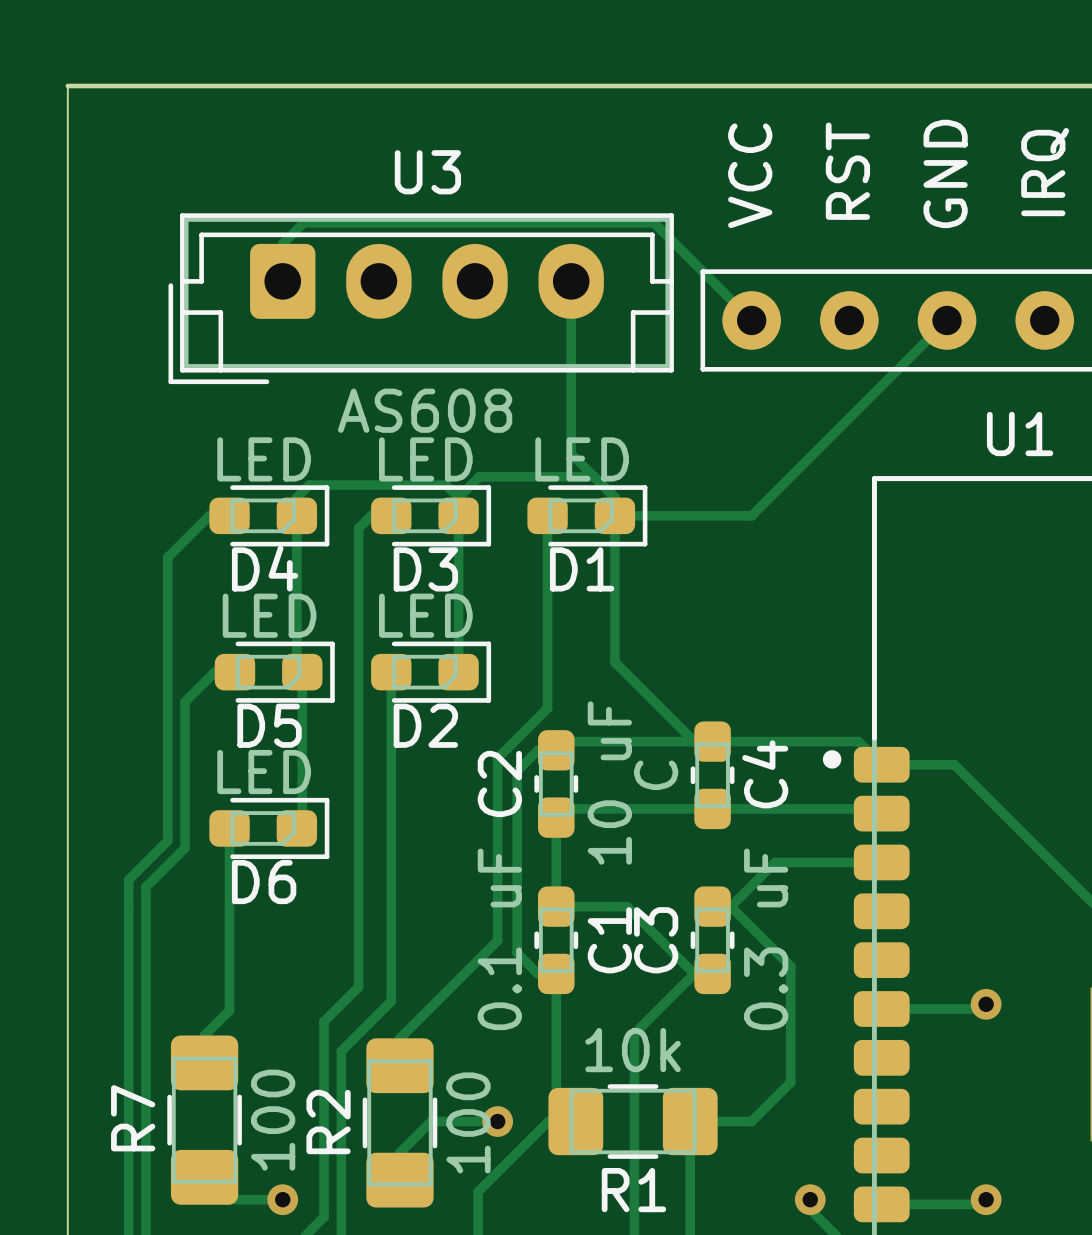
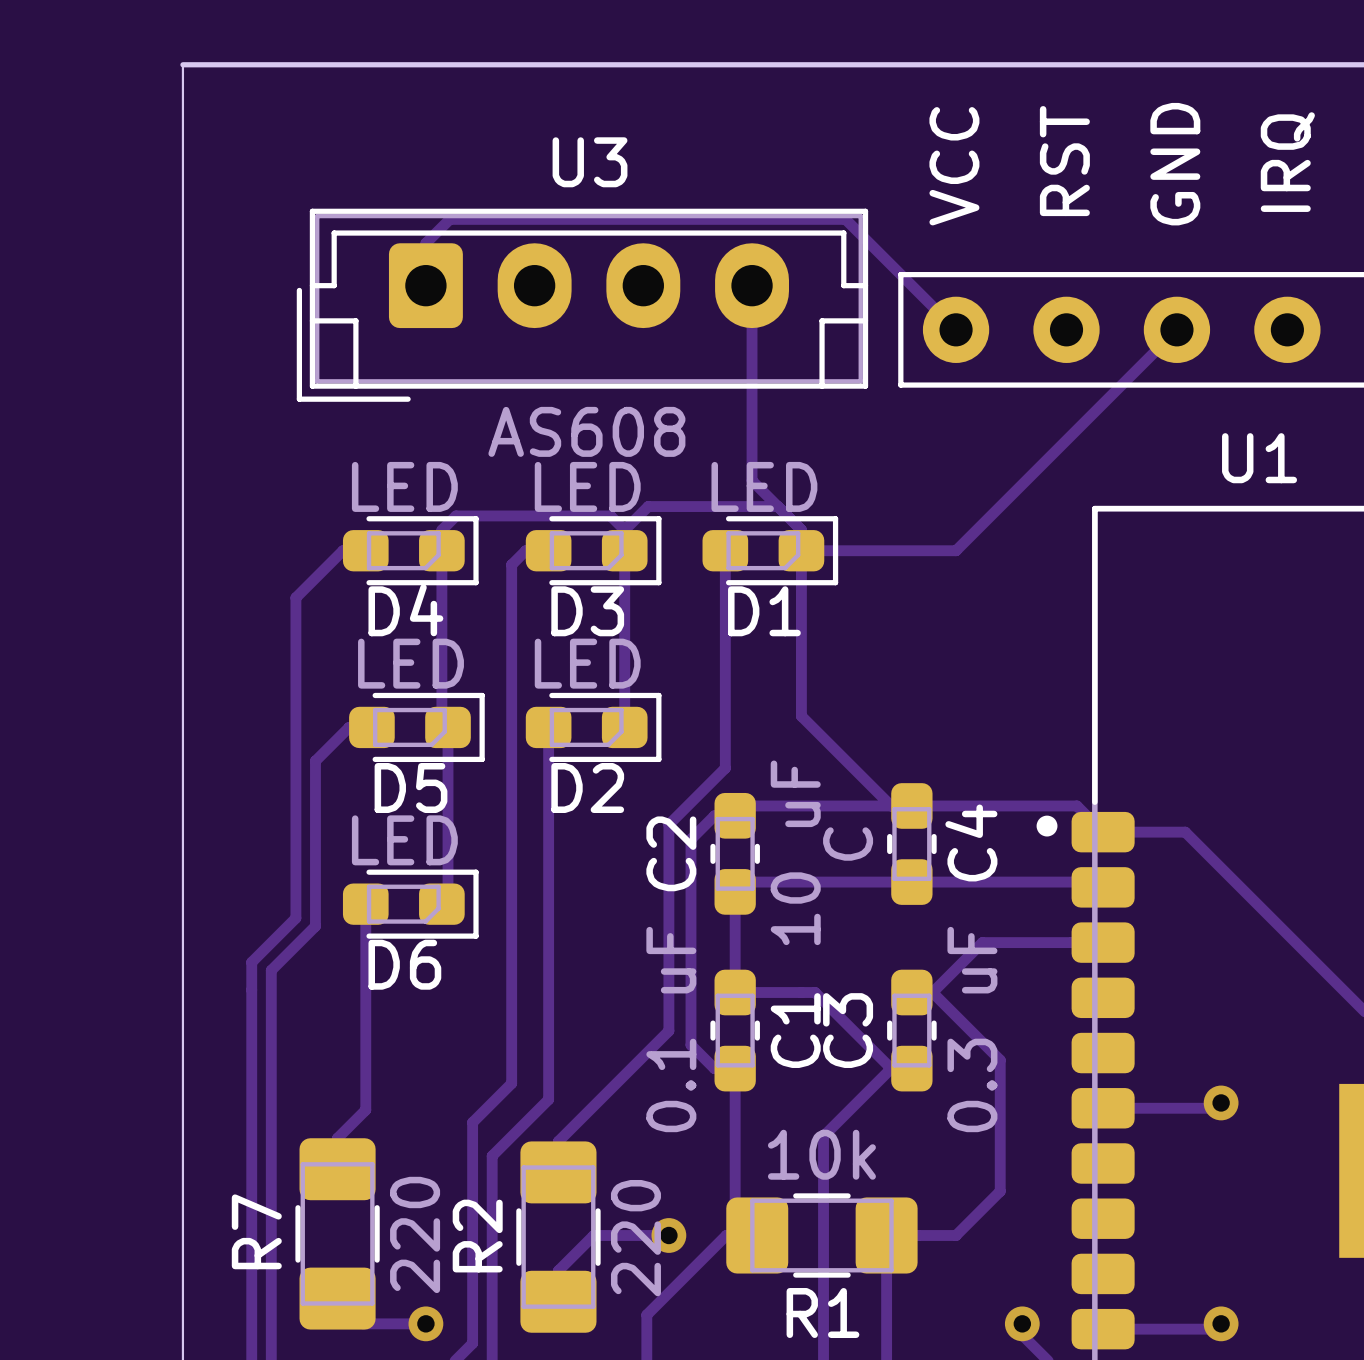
R7 value: 100 (273, 1120) -> 220 (415, 1234)
R2 value: 100 (468, 1122) -> 220 (635, 1238)

